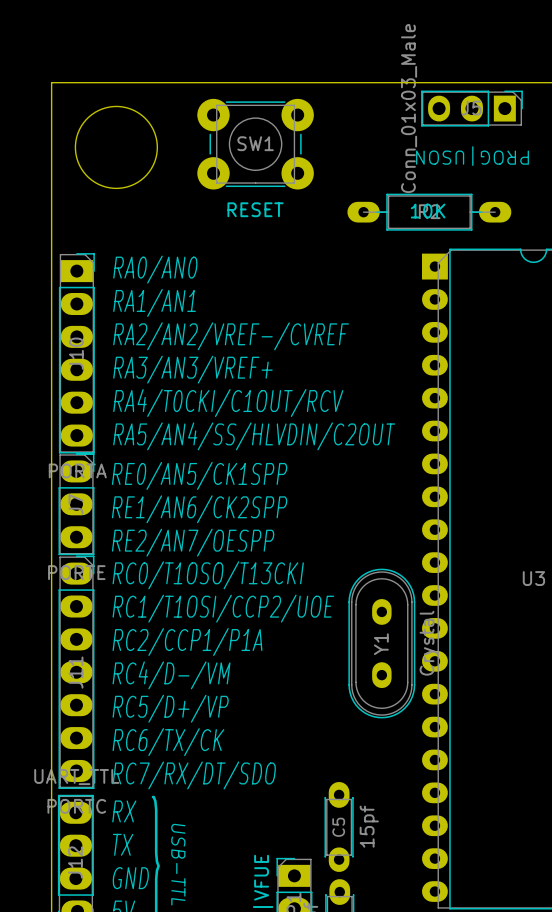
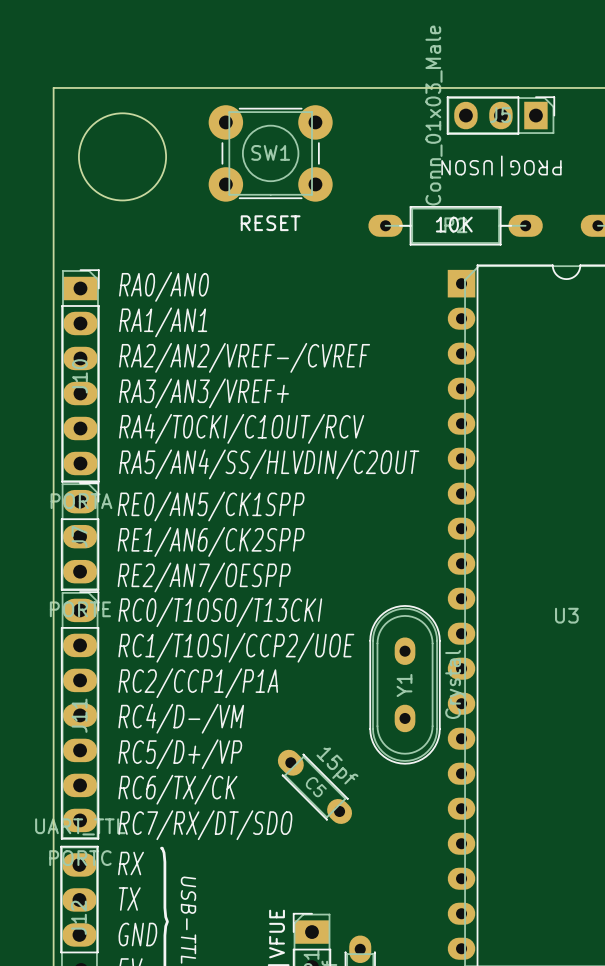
C5 rotation: 0° (339, 826) -> 45° counterclockwise (314, 786)
C5 position: (339, 826) -> (314, 786)

